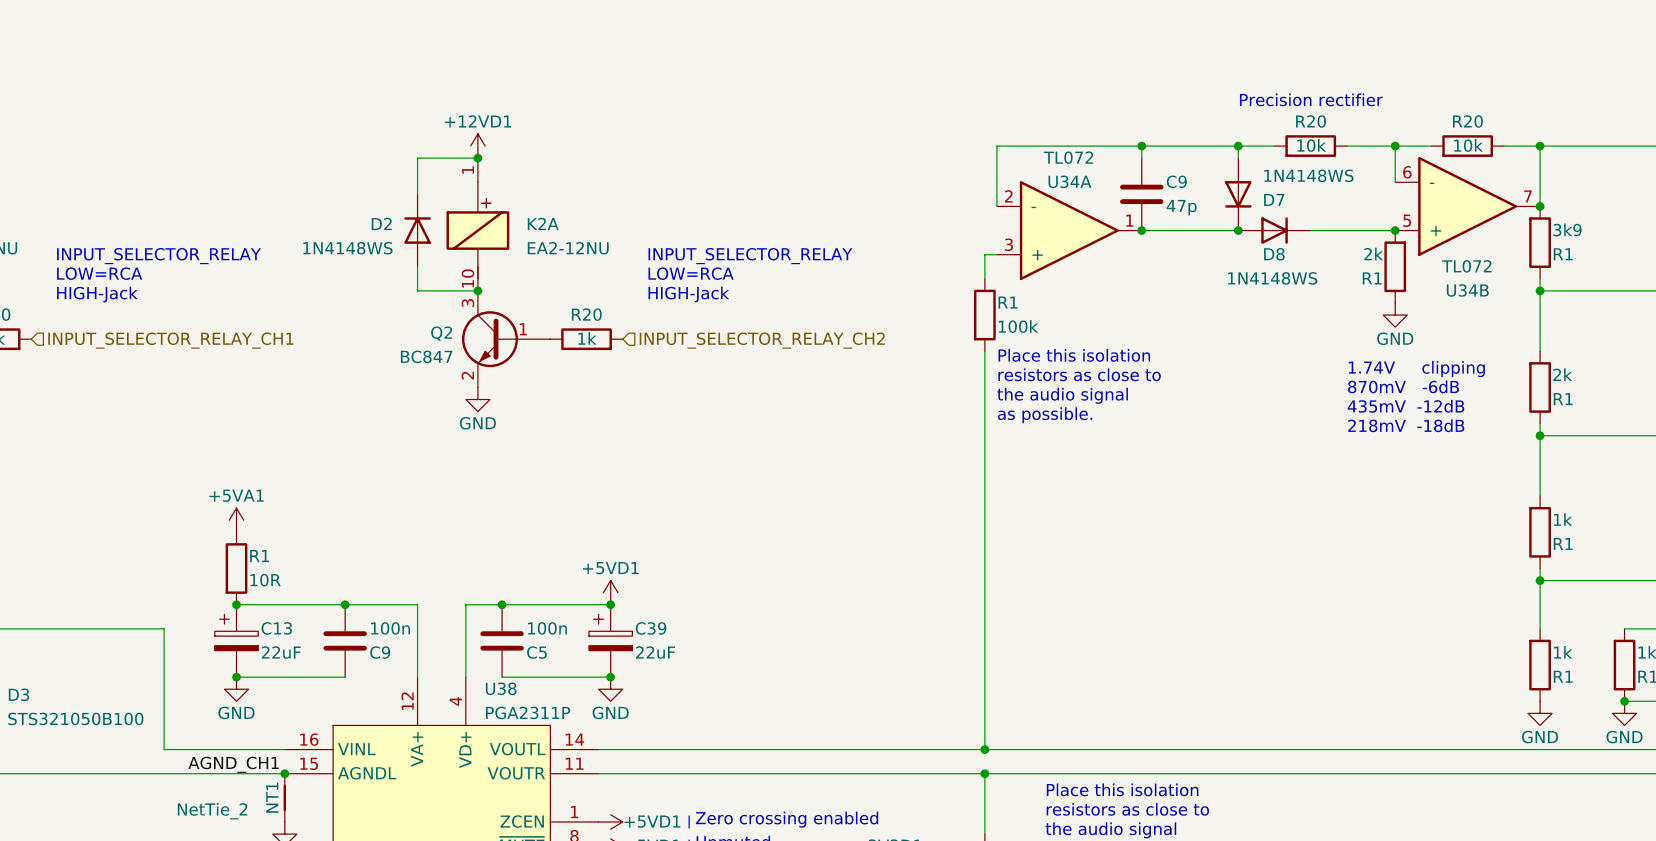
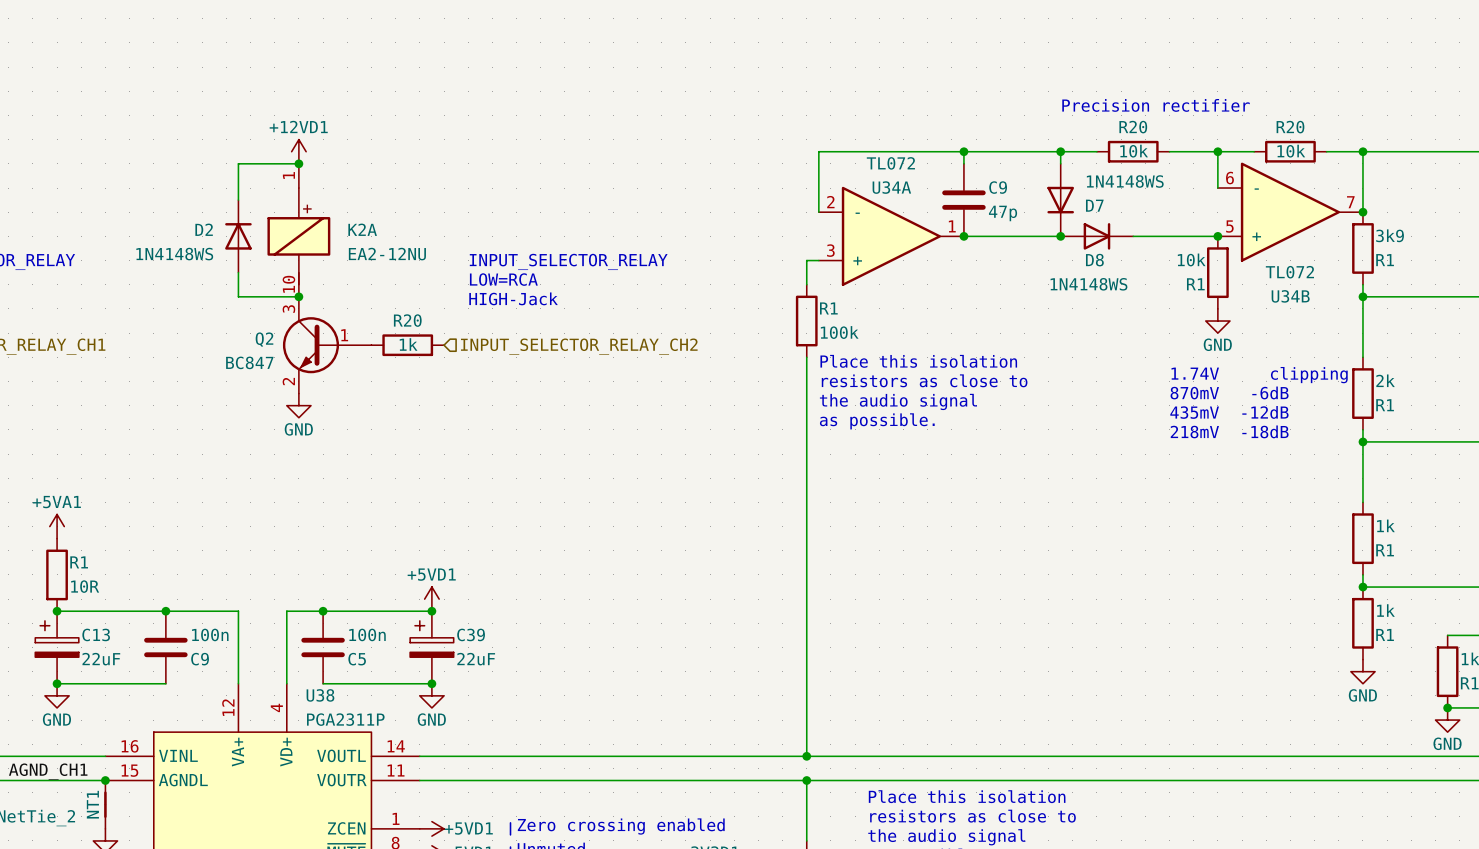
R1 value: 2k (1373, 253) -> 10k (1191, 259)
wire: (1540, 580) (1540, 628) -> none
R1 position: (1540, 665) -> (1362, 623)
power symbol position: GND (1540, 713) -> GND (1362, 671)

